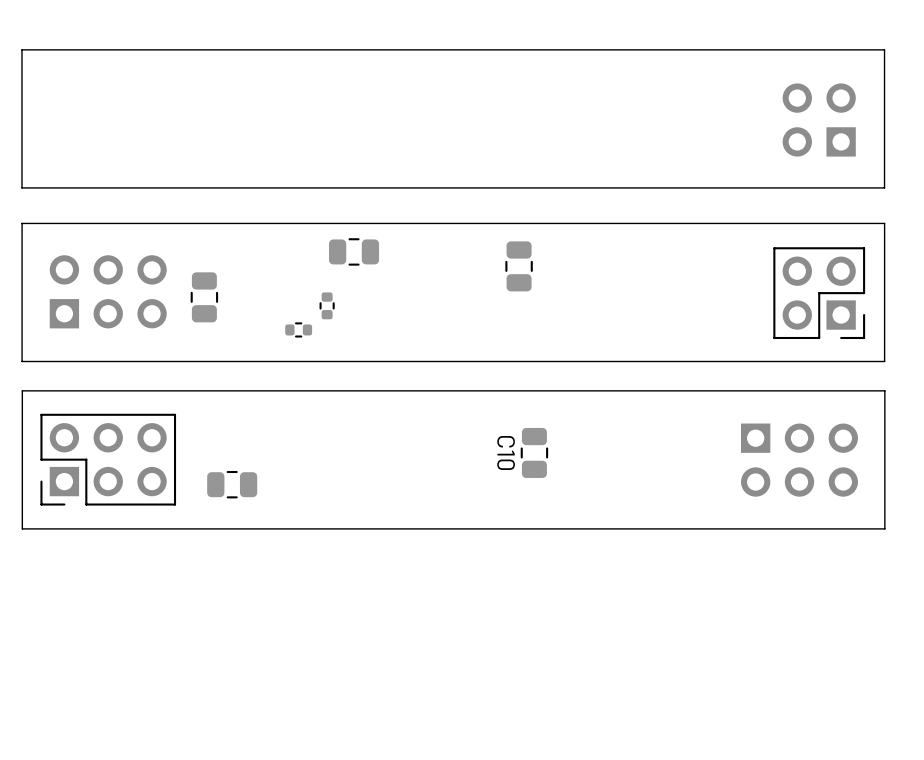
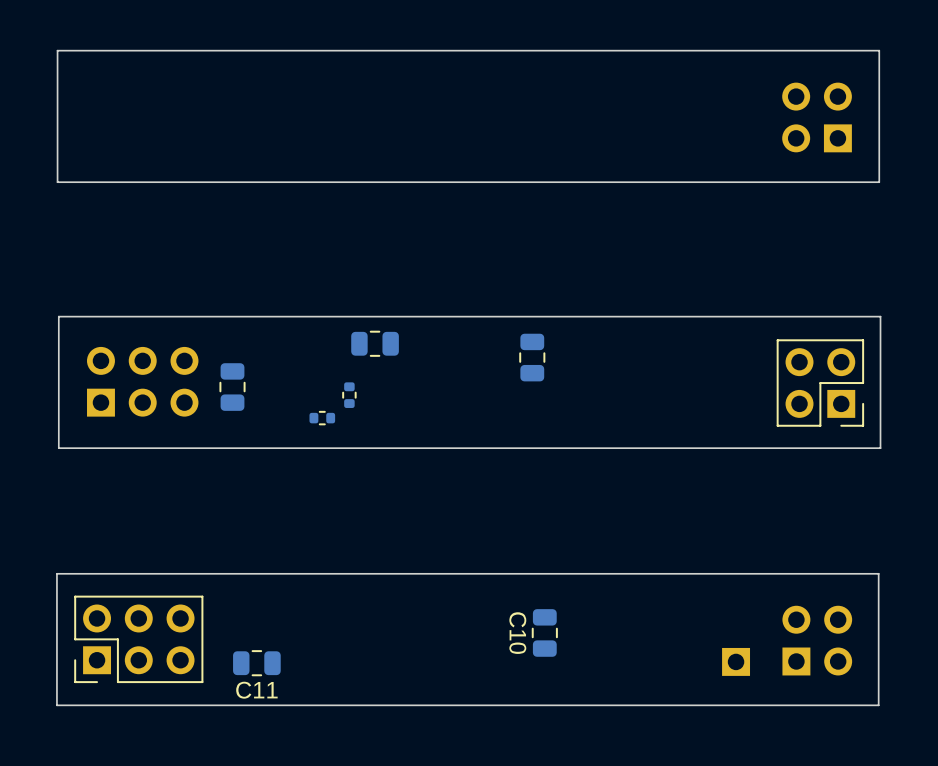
board edge: (884, 223) (22, 223) (22, 361) (884, 361) (884, 223) -> (878, 573) (56, 573) (56, 705) (878, 705) (878, 573)
part: (354, 251) -> none
part: (519, 266) -> none
part position: (108, 291) -> (142, 381)
part position: (819, 293) -> (820, 383)
part: (204, 297) -> none
part: (327, 305) -> none
part: (298, 329) -> none
part: none -> (375, 343)
part: none -> (532, 357)
board edge: (884, 390) (22, 390) (22, 528) (884, 528) (884, 390) -> (880, 316) (58, 316) (58, 448) (880, 448) (880, 316)
part: none -> (232, 387)
part: none -> (349, 395)
part: none -> (322, 418)
C10 position: (534, 452) -> (544, 632)
part position: (108, 459) -> (138, 639)
part: (799, 460) -> none
part: (232, 484) -> none
part: none -> (817, 640)
part: none -> (736, 661)
C11: none -> (256, 663)

